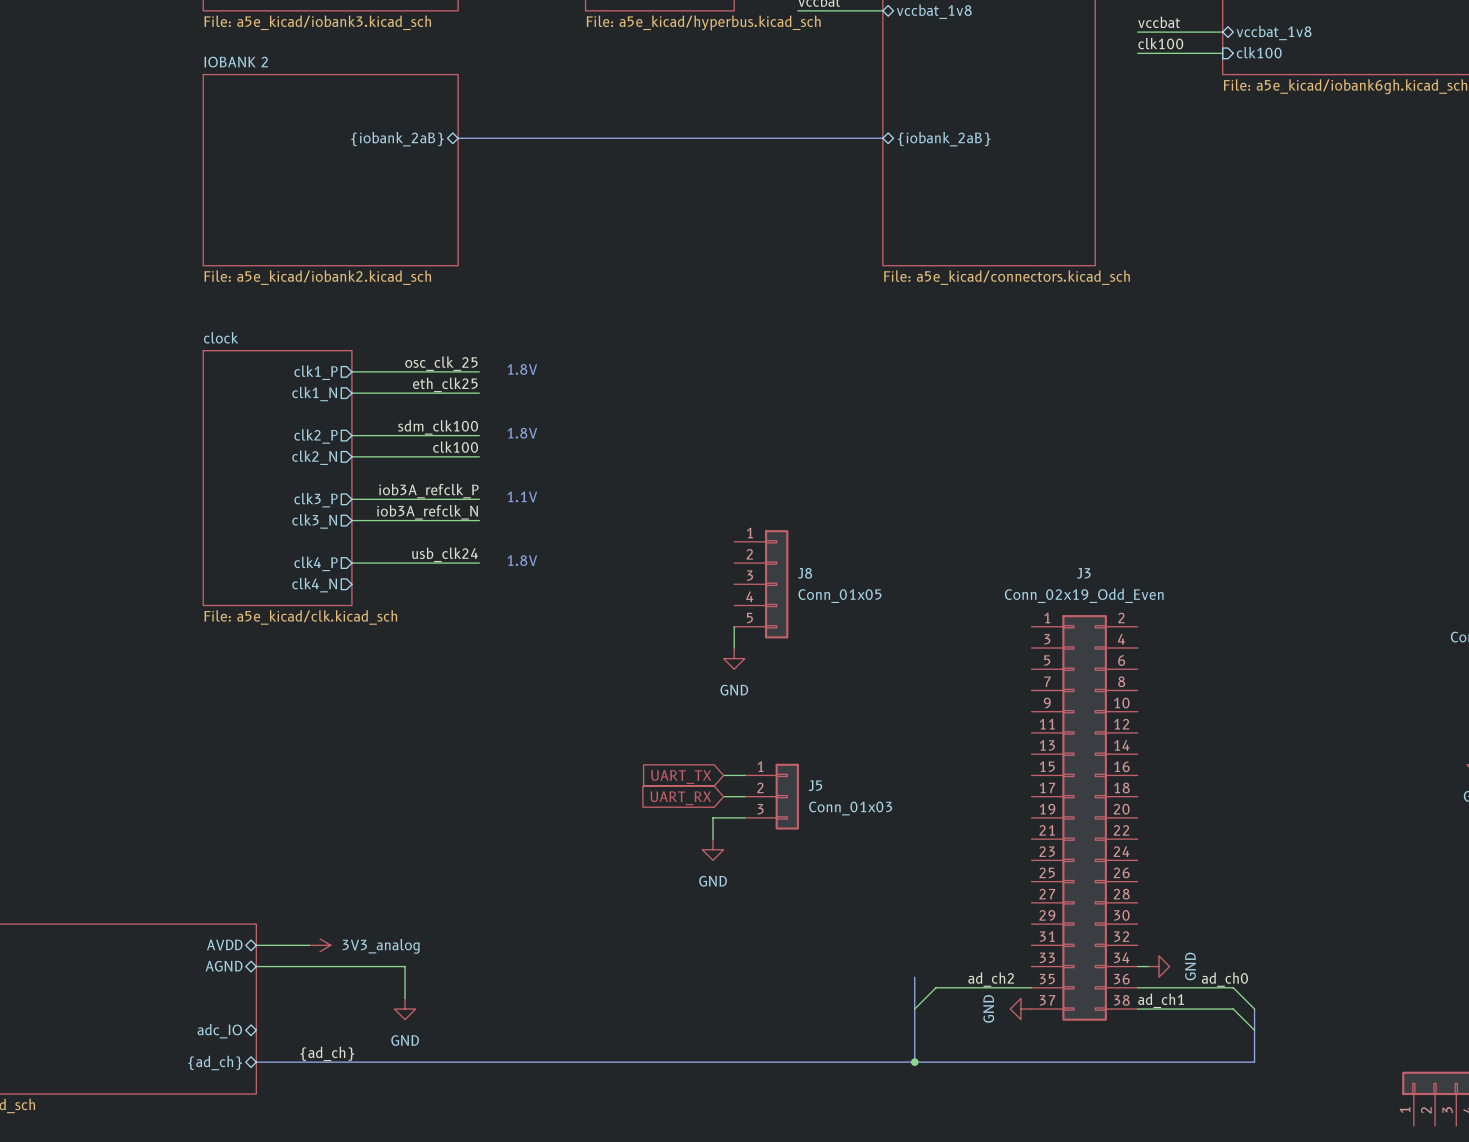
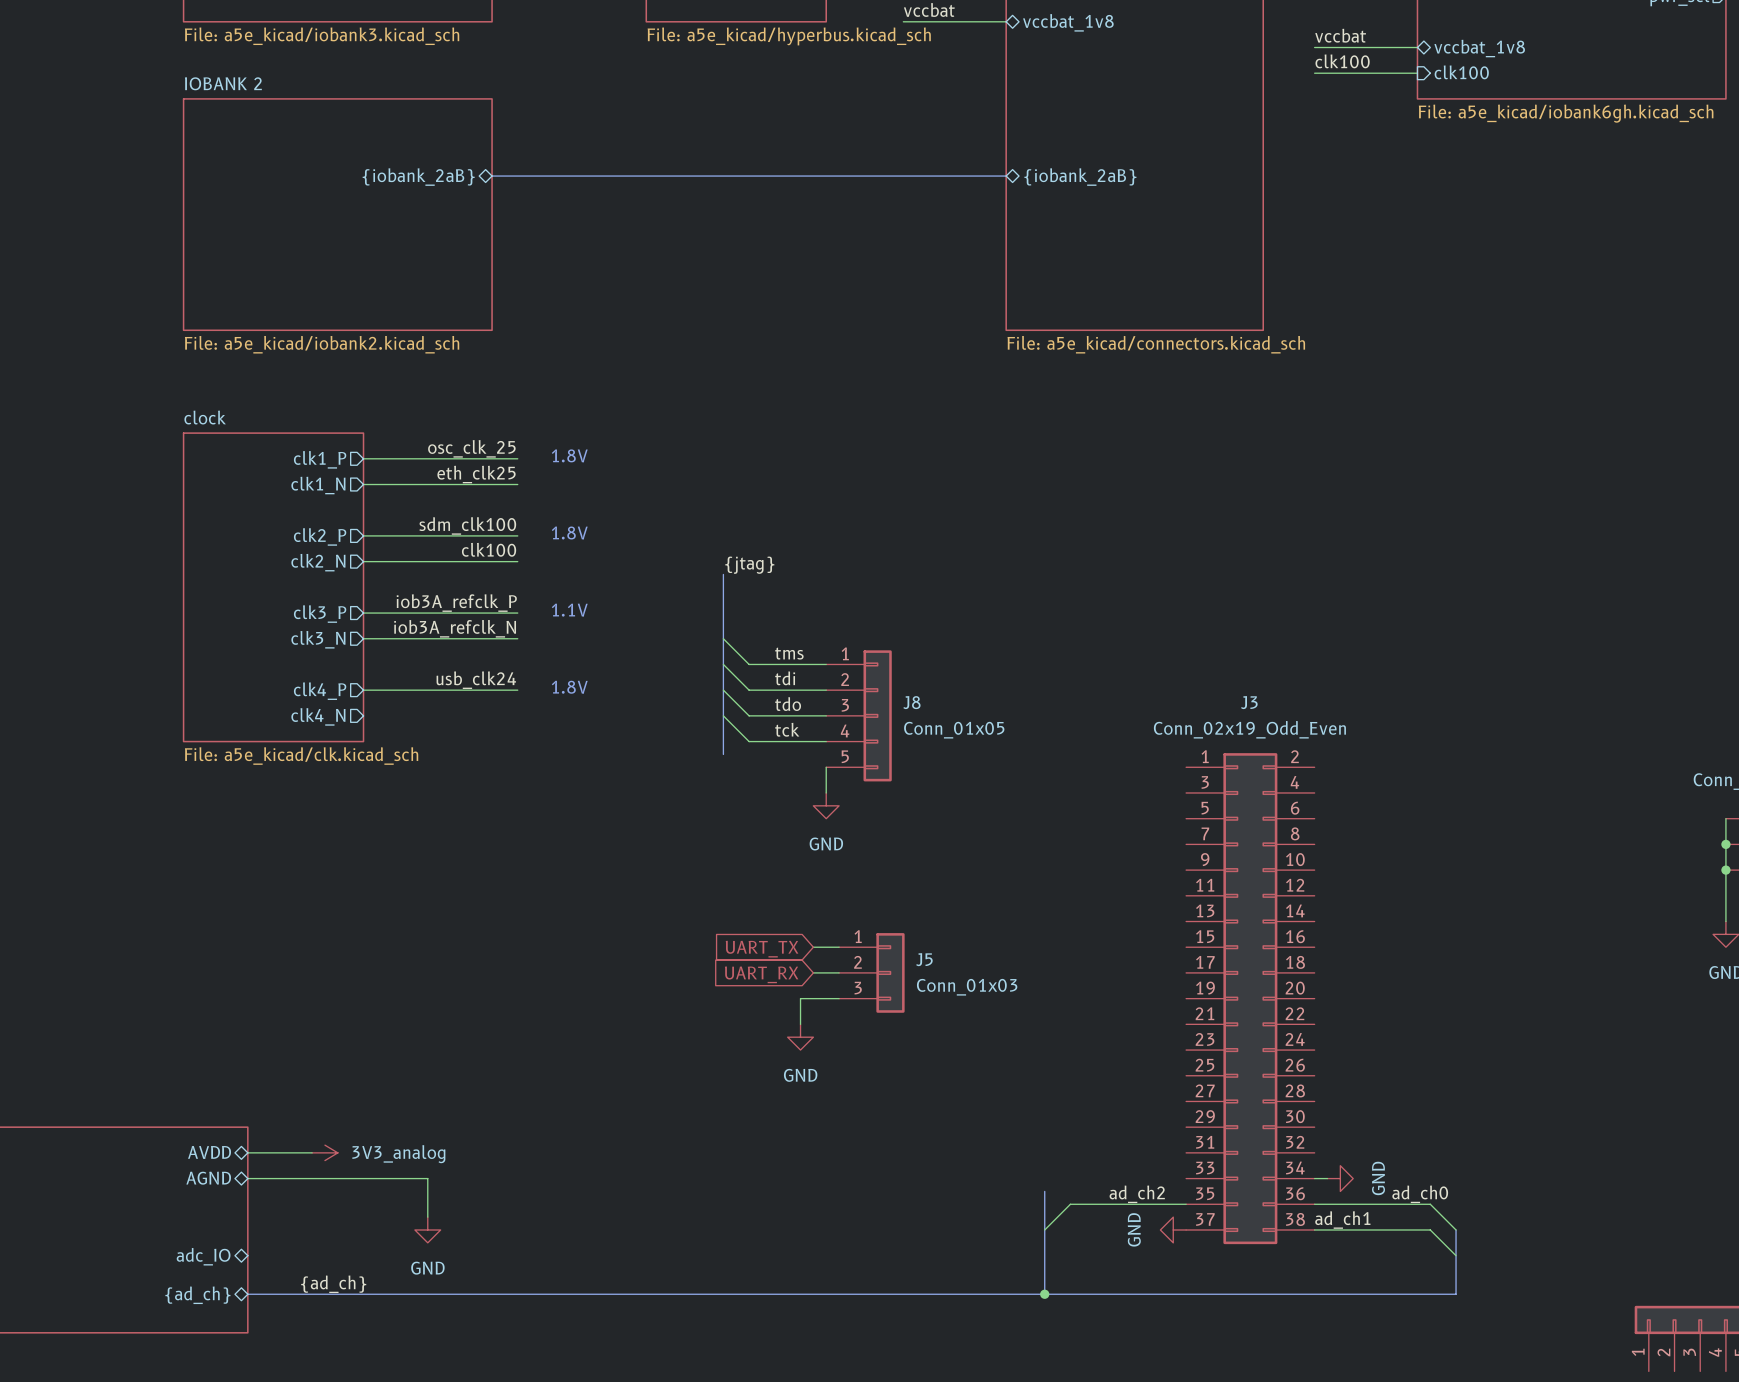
label: none -> {jtag} (749, 565)
bus: none -> (723, 574) (723, 754)
wire: none -> (723, 638) (749, 664) (826, 664)
label: none -> tms (789, 653)
wire: none -> (723, 664) (749, 690) (826, 690)
label: none -> tdi (785, 678)
wire: none -> (723, 690) (749, 715) (826, 715)
label: none -> tdo (788, 704)
wire: none -> (723, 715) (749, 741) (826, 741)
label: none -> tck (787, 729)

